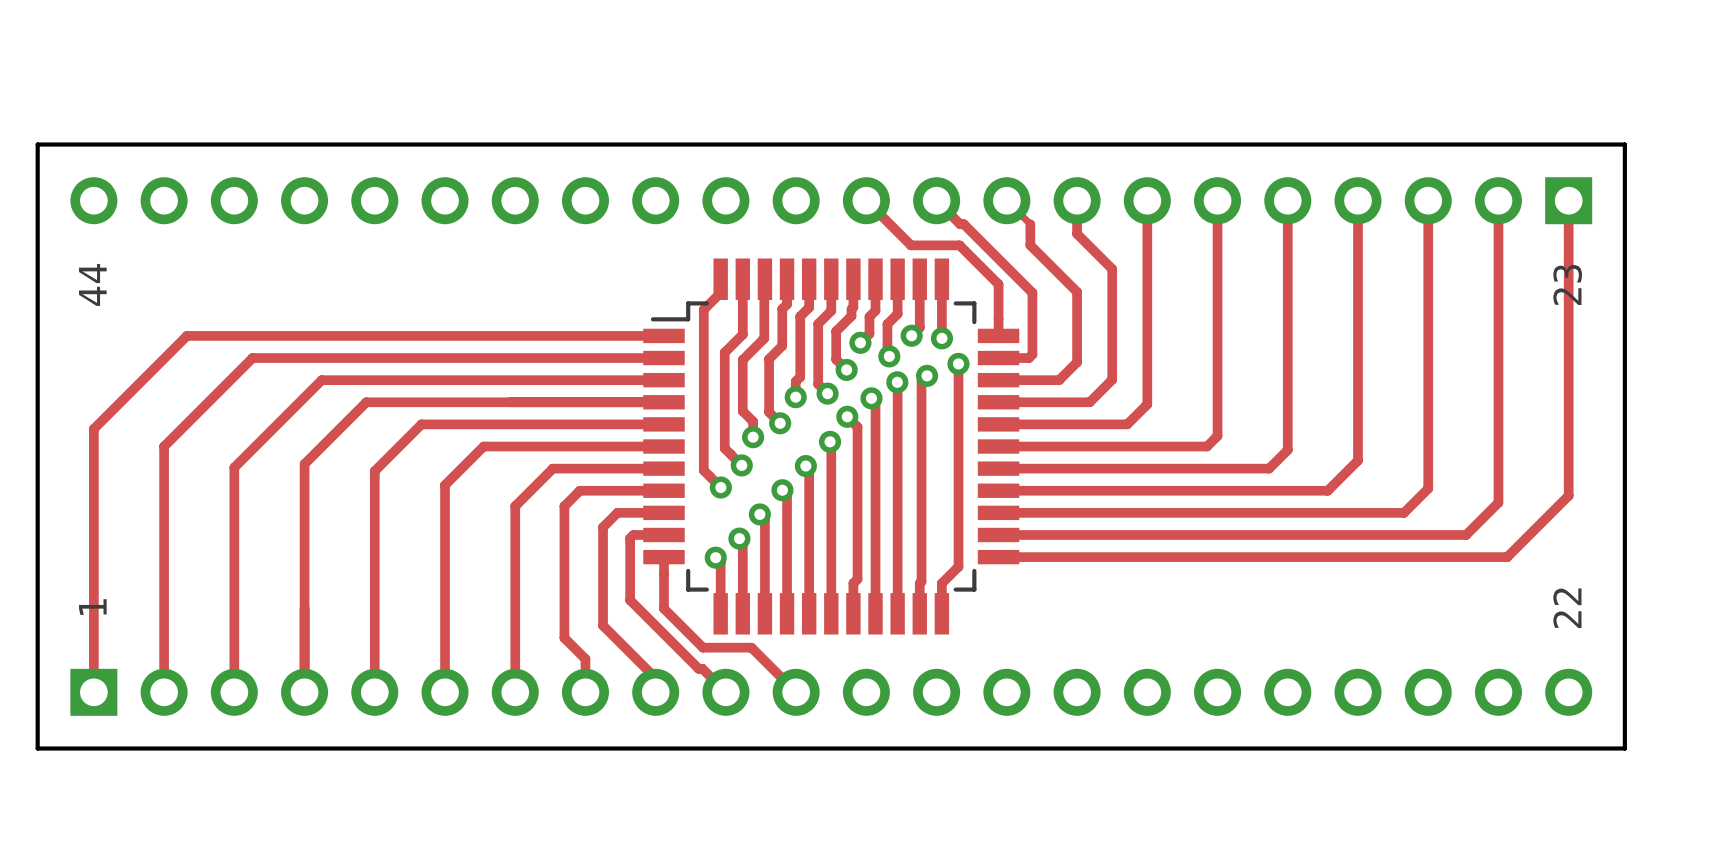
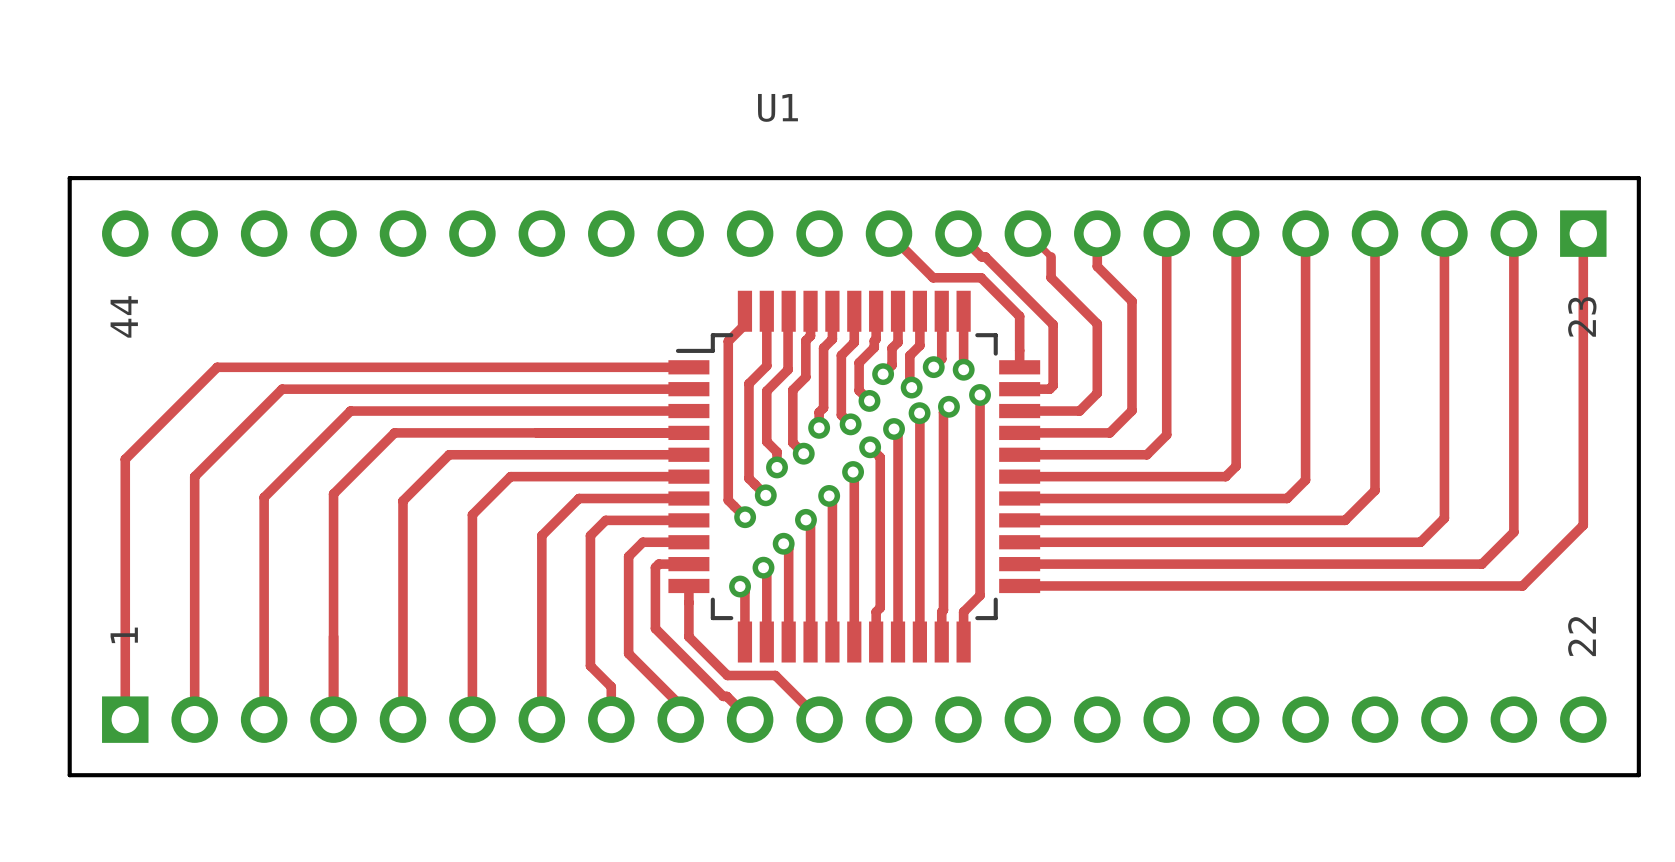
U1 name: none -> U1 (777, 107)

